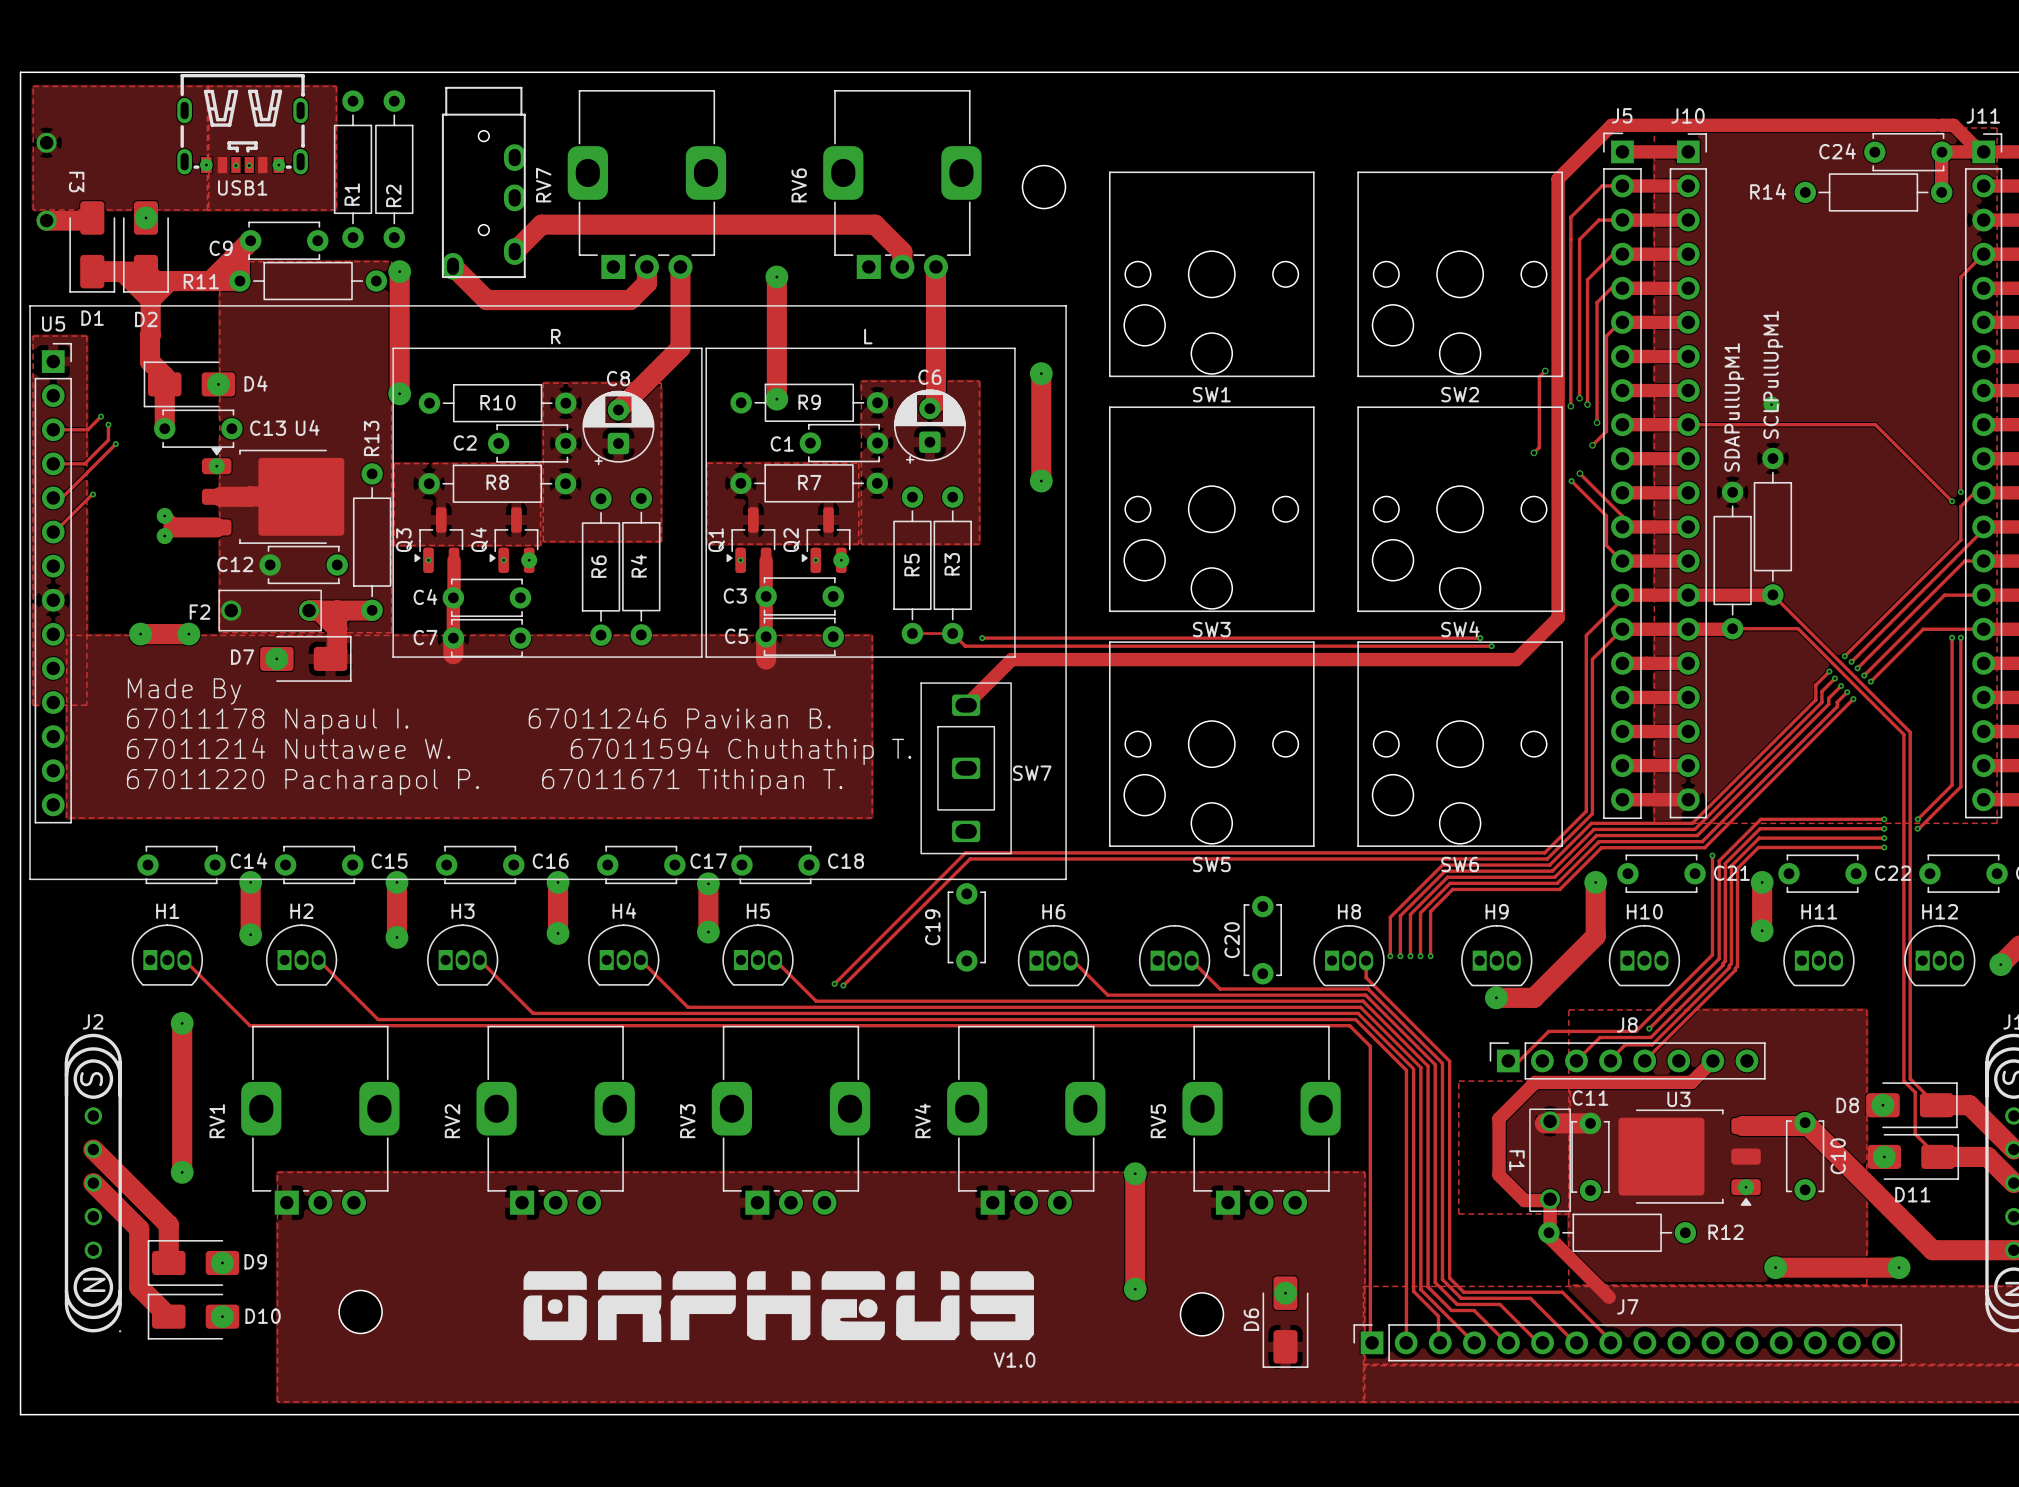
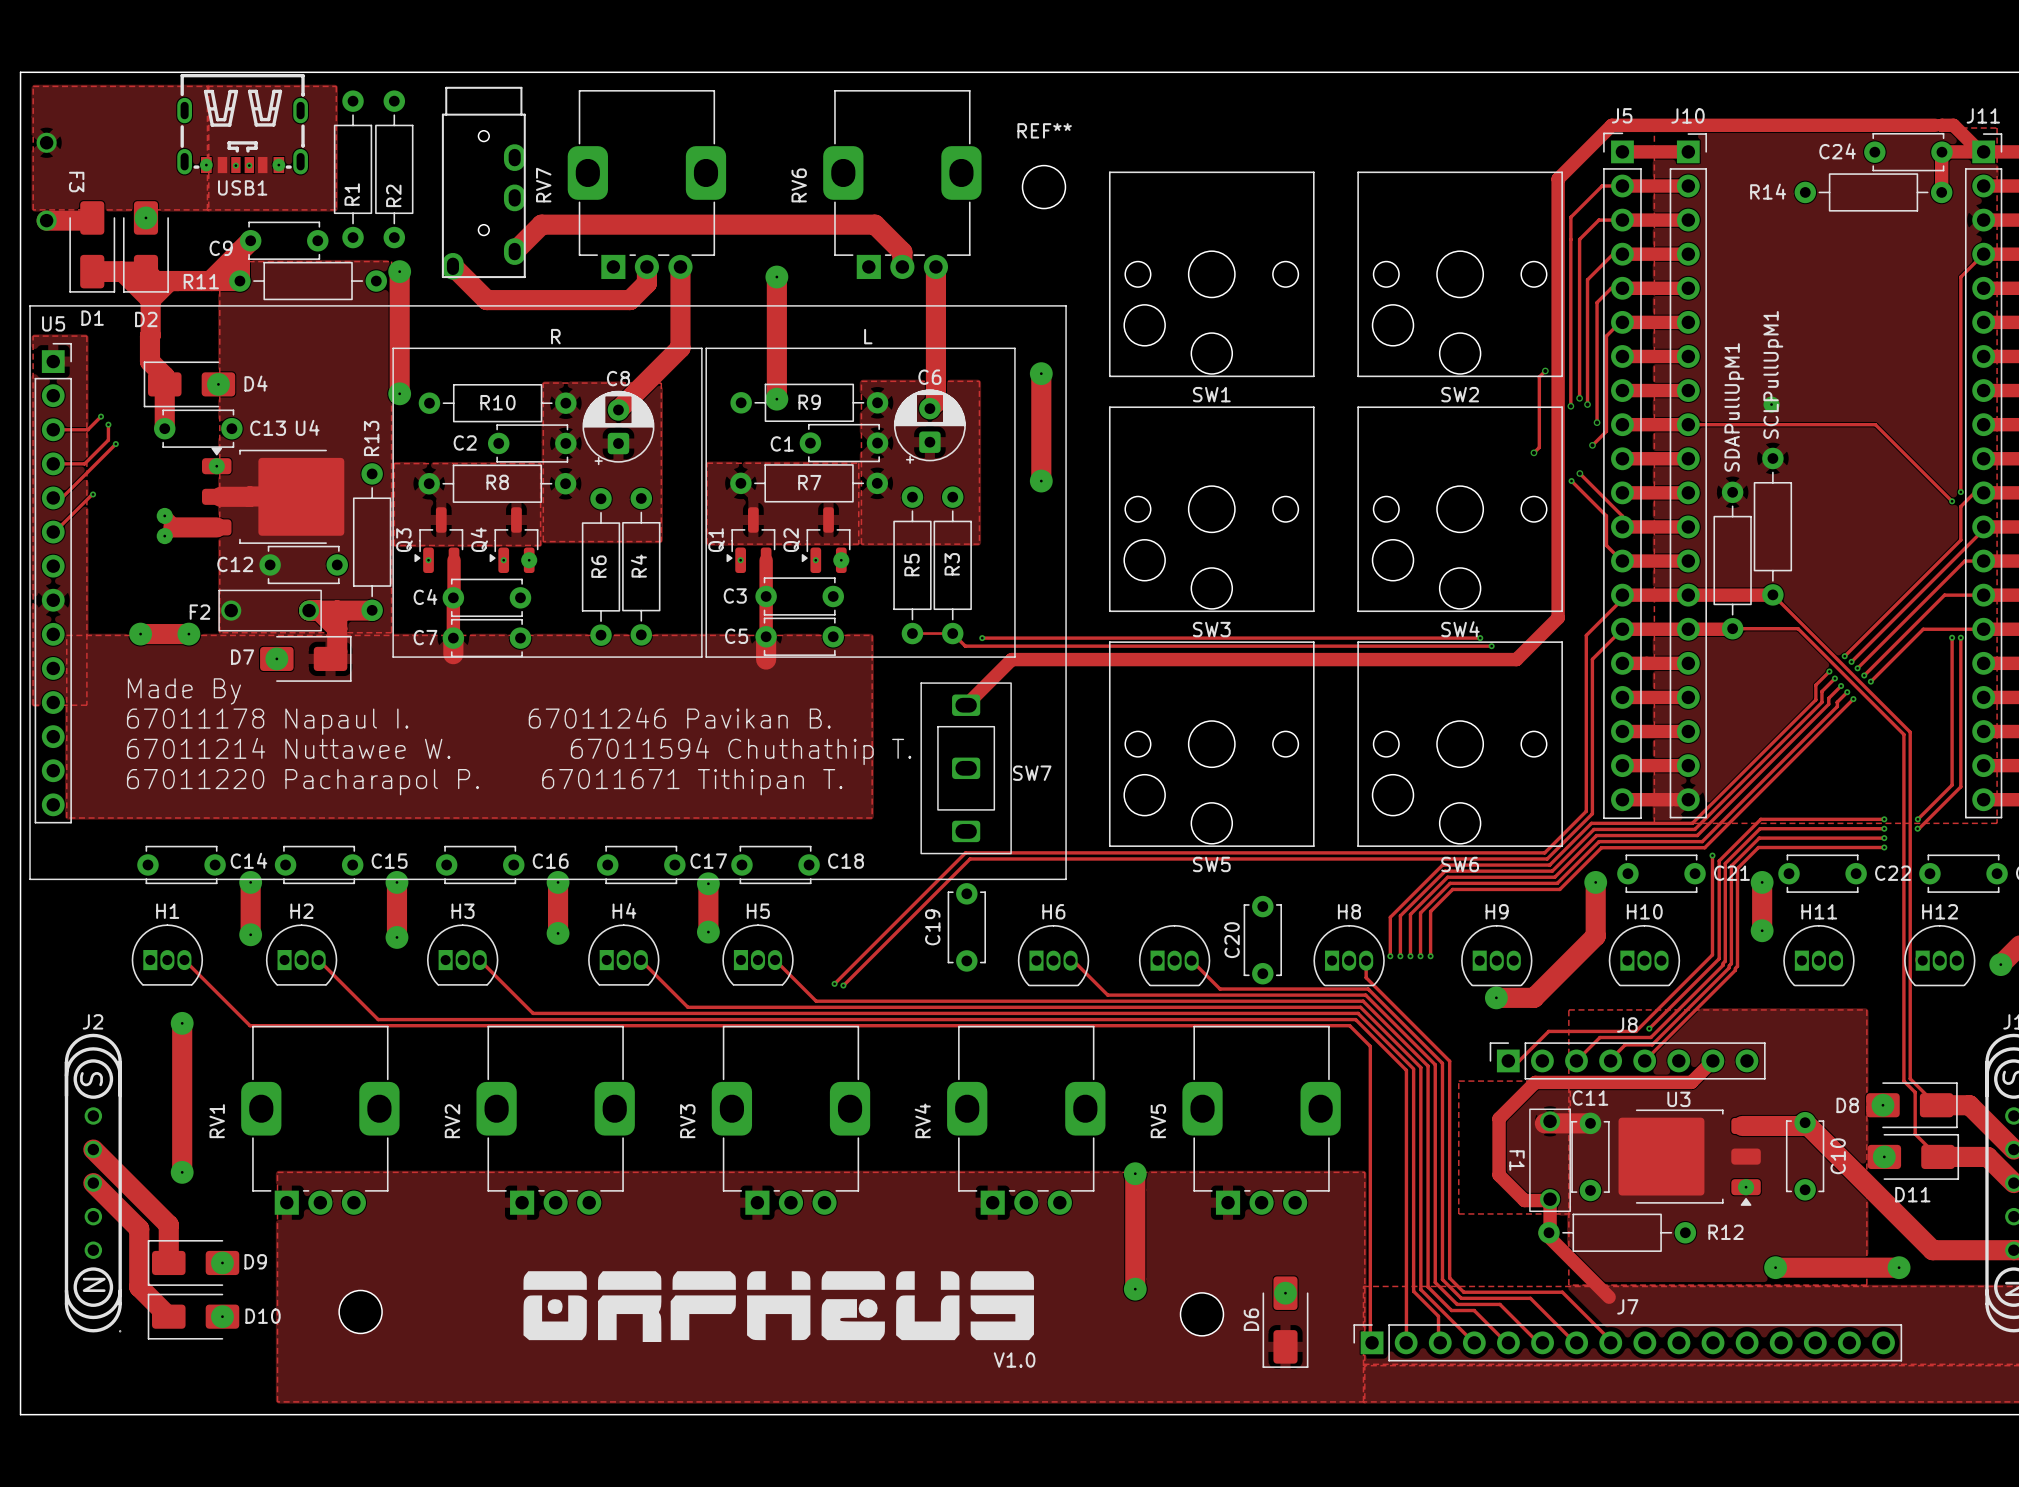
REF** name: none -> REF** (1044, 130)

